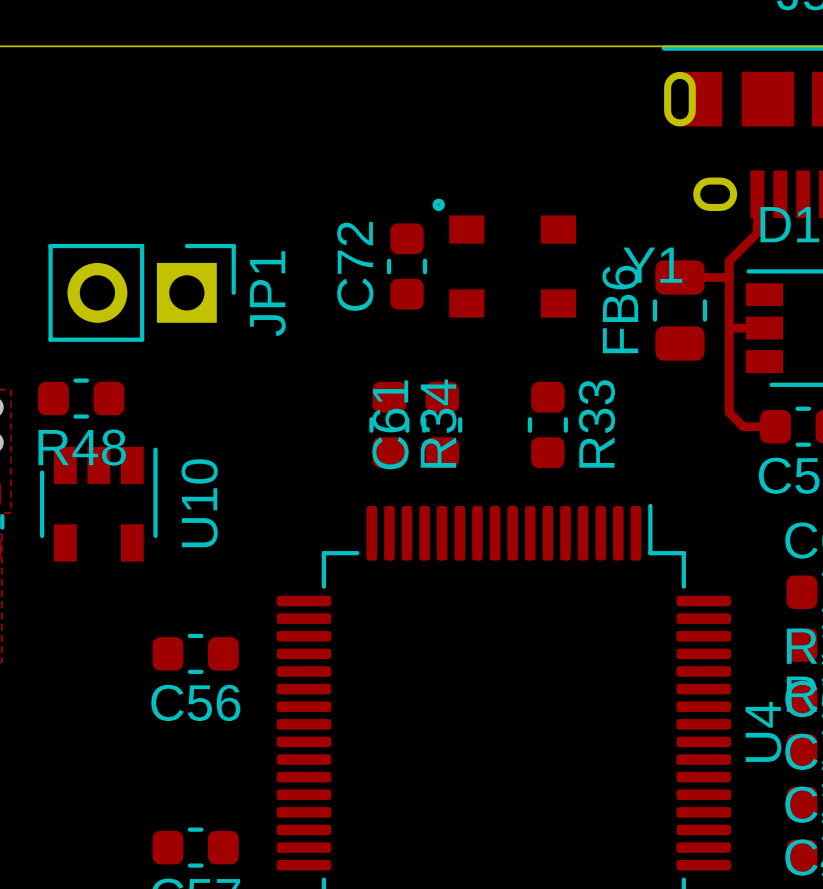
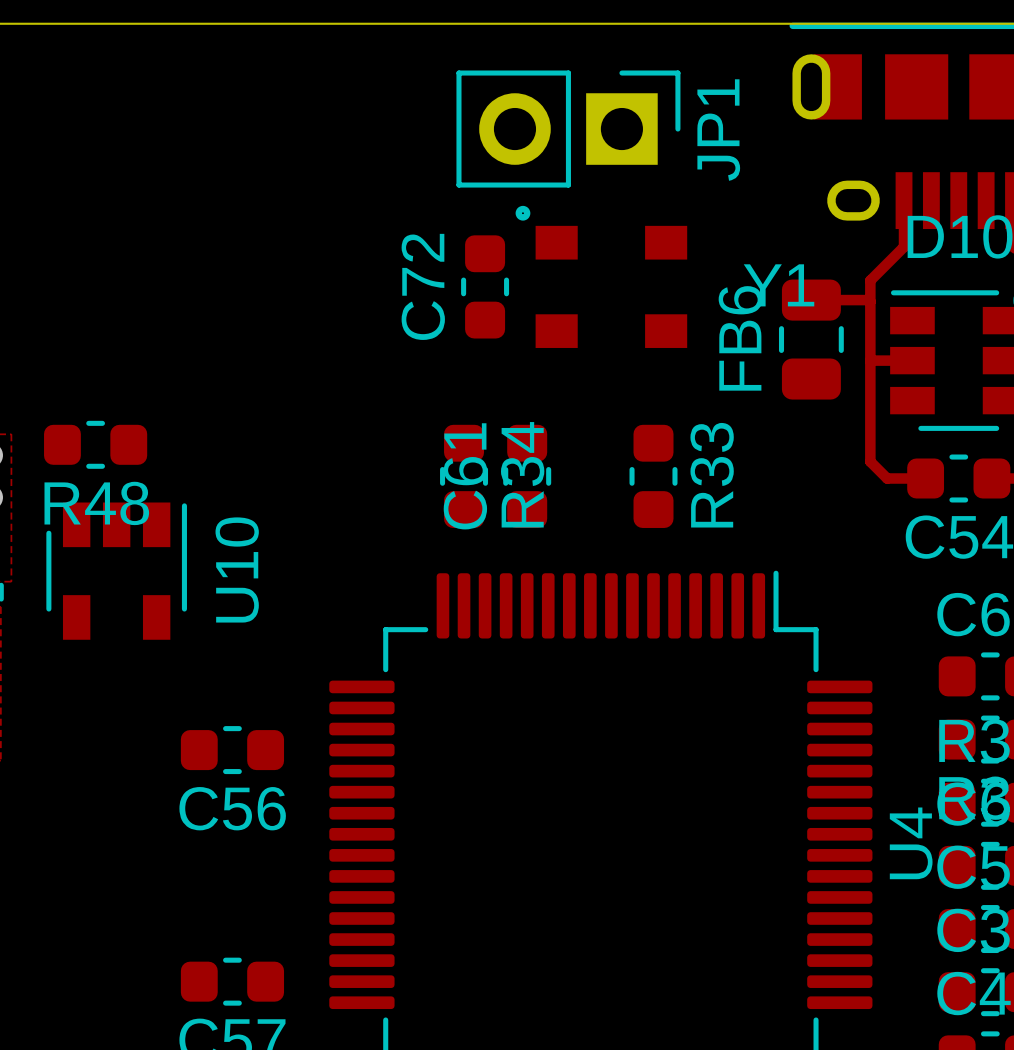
JP1 position: (142, 292) -> (568, 129)

